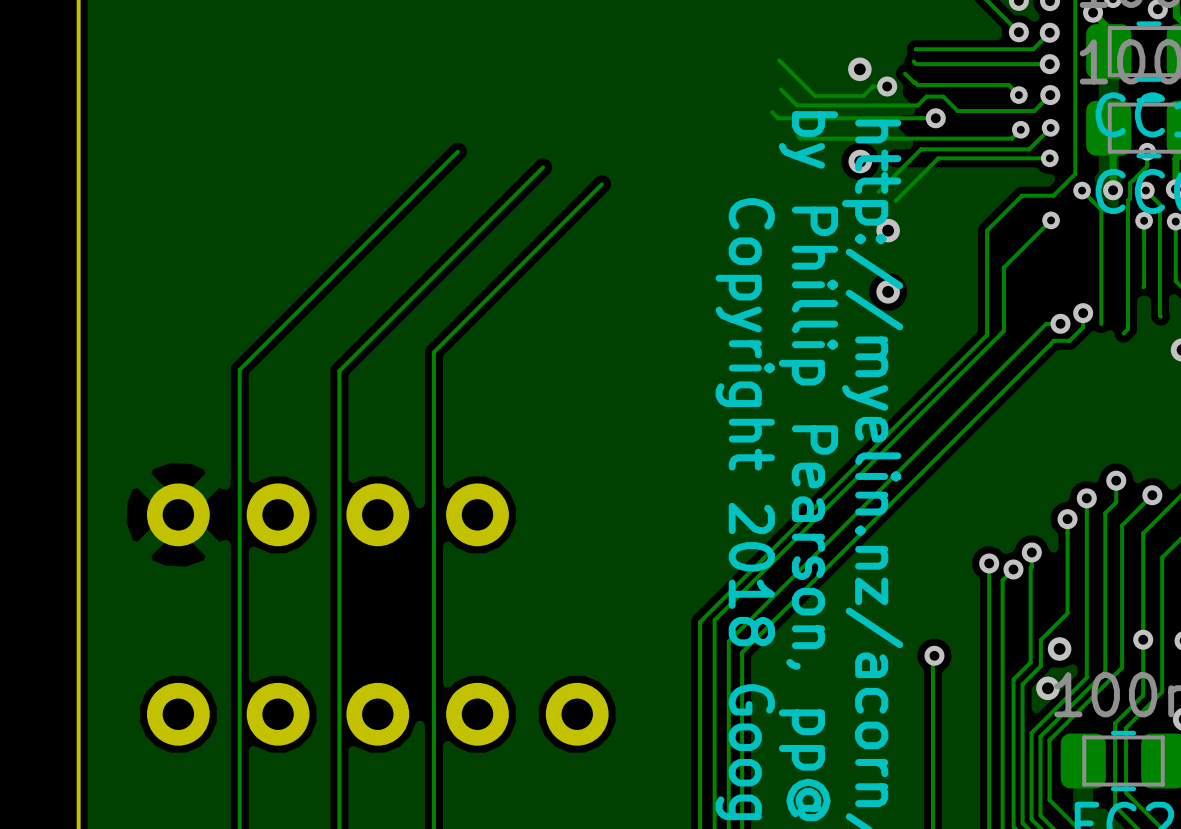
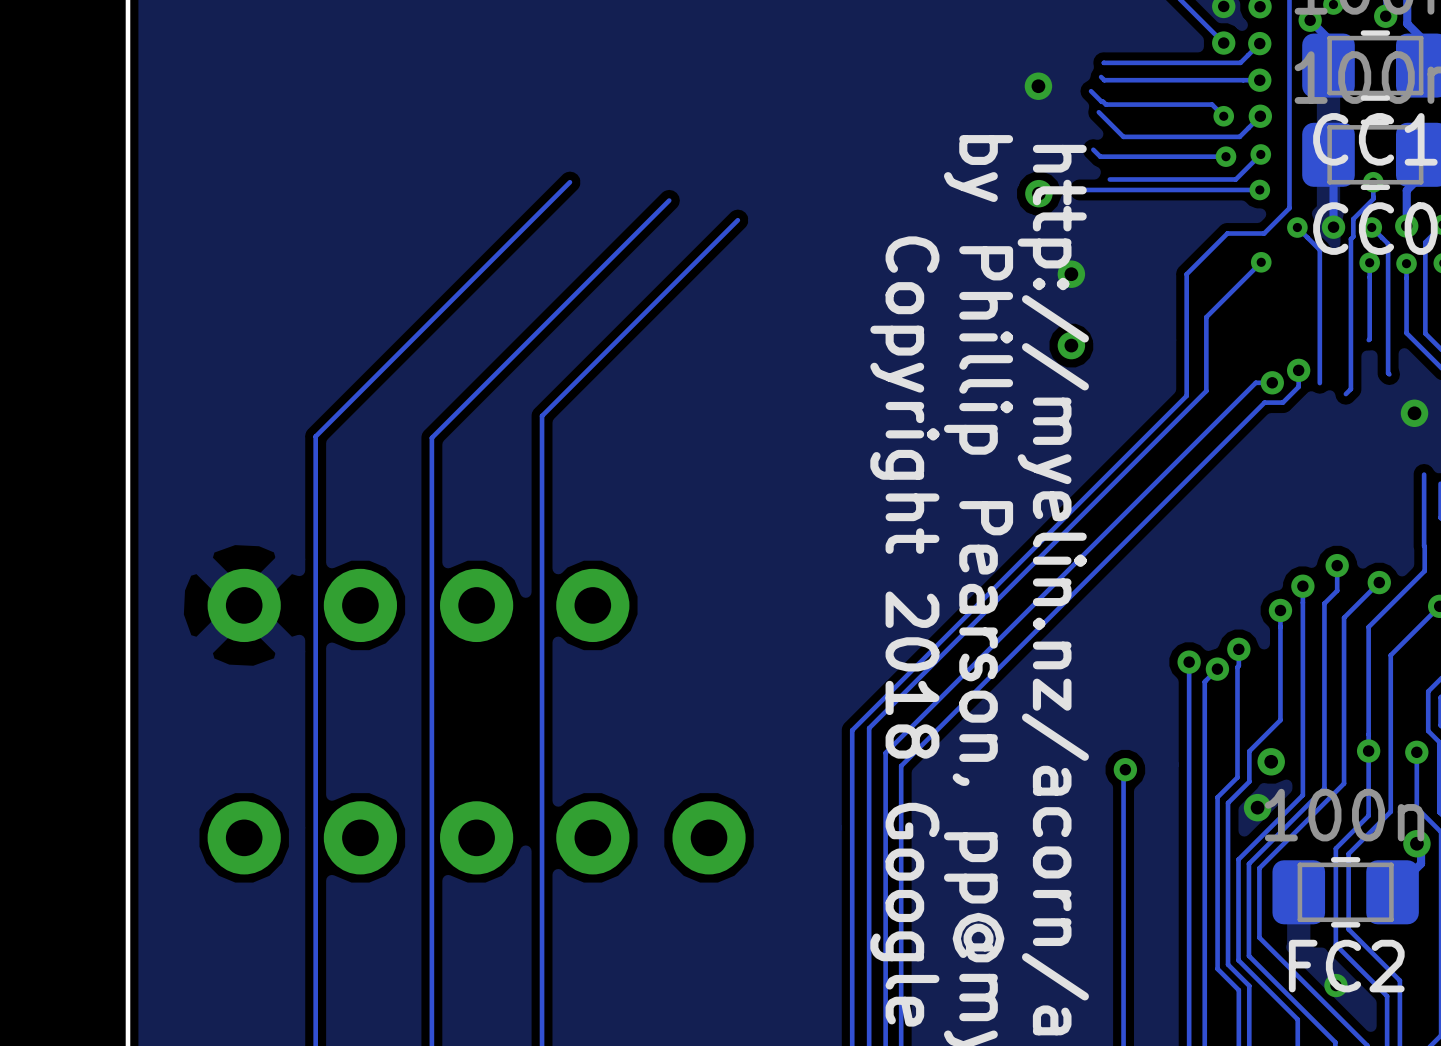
track: (779, 60) (815, 96) (863, 96) (873, 86) (887, 86) -> none
via: (887, 86) -> none
track: (780, 89) (796, 105) (917, 105) (926, 96) (943, 96) (957, 111) (1034, 111) -> (1098, 112) (1123, 136) (1239, 136) (1241, 134)
track: (772, 112) (778, 118) (935, 118) -> none
via: (935, 118) -> none
track: (1020, 129) (1011, 138) (800, 138) (798, 136) -> (1226, 156) (1100, 156) (1093, 149)
track: (921, 149) (878, 191) -> none
track: (938, 158) (895, 200) -> (1129, 189) (1080, 189)

